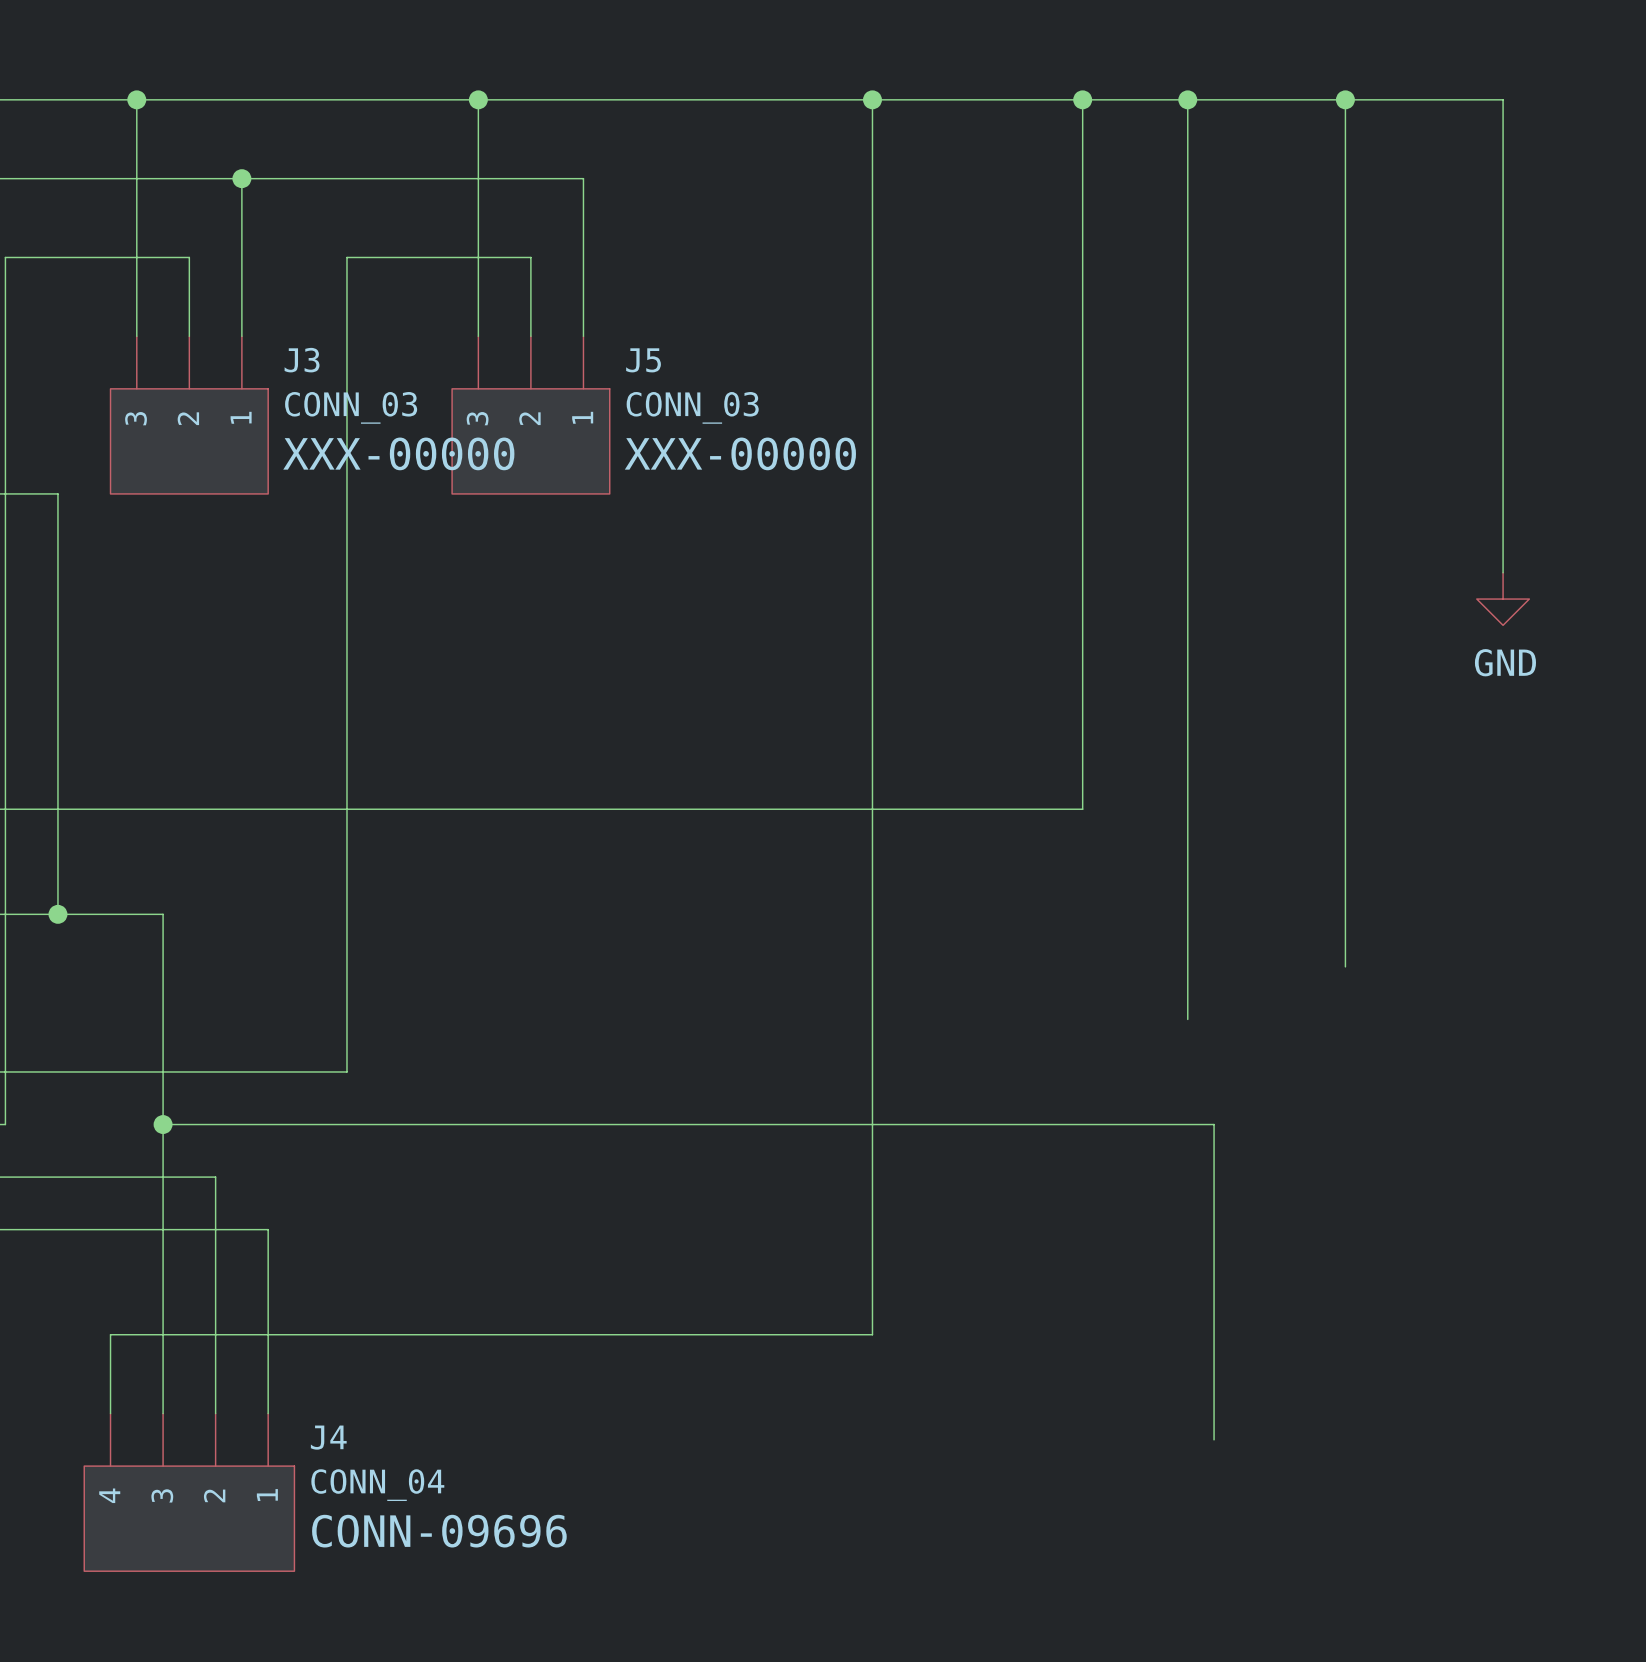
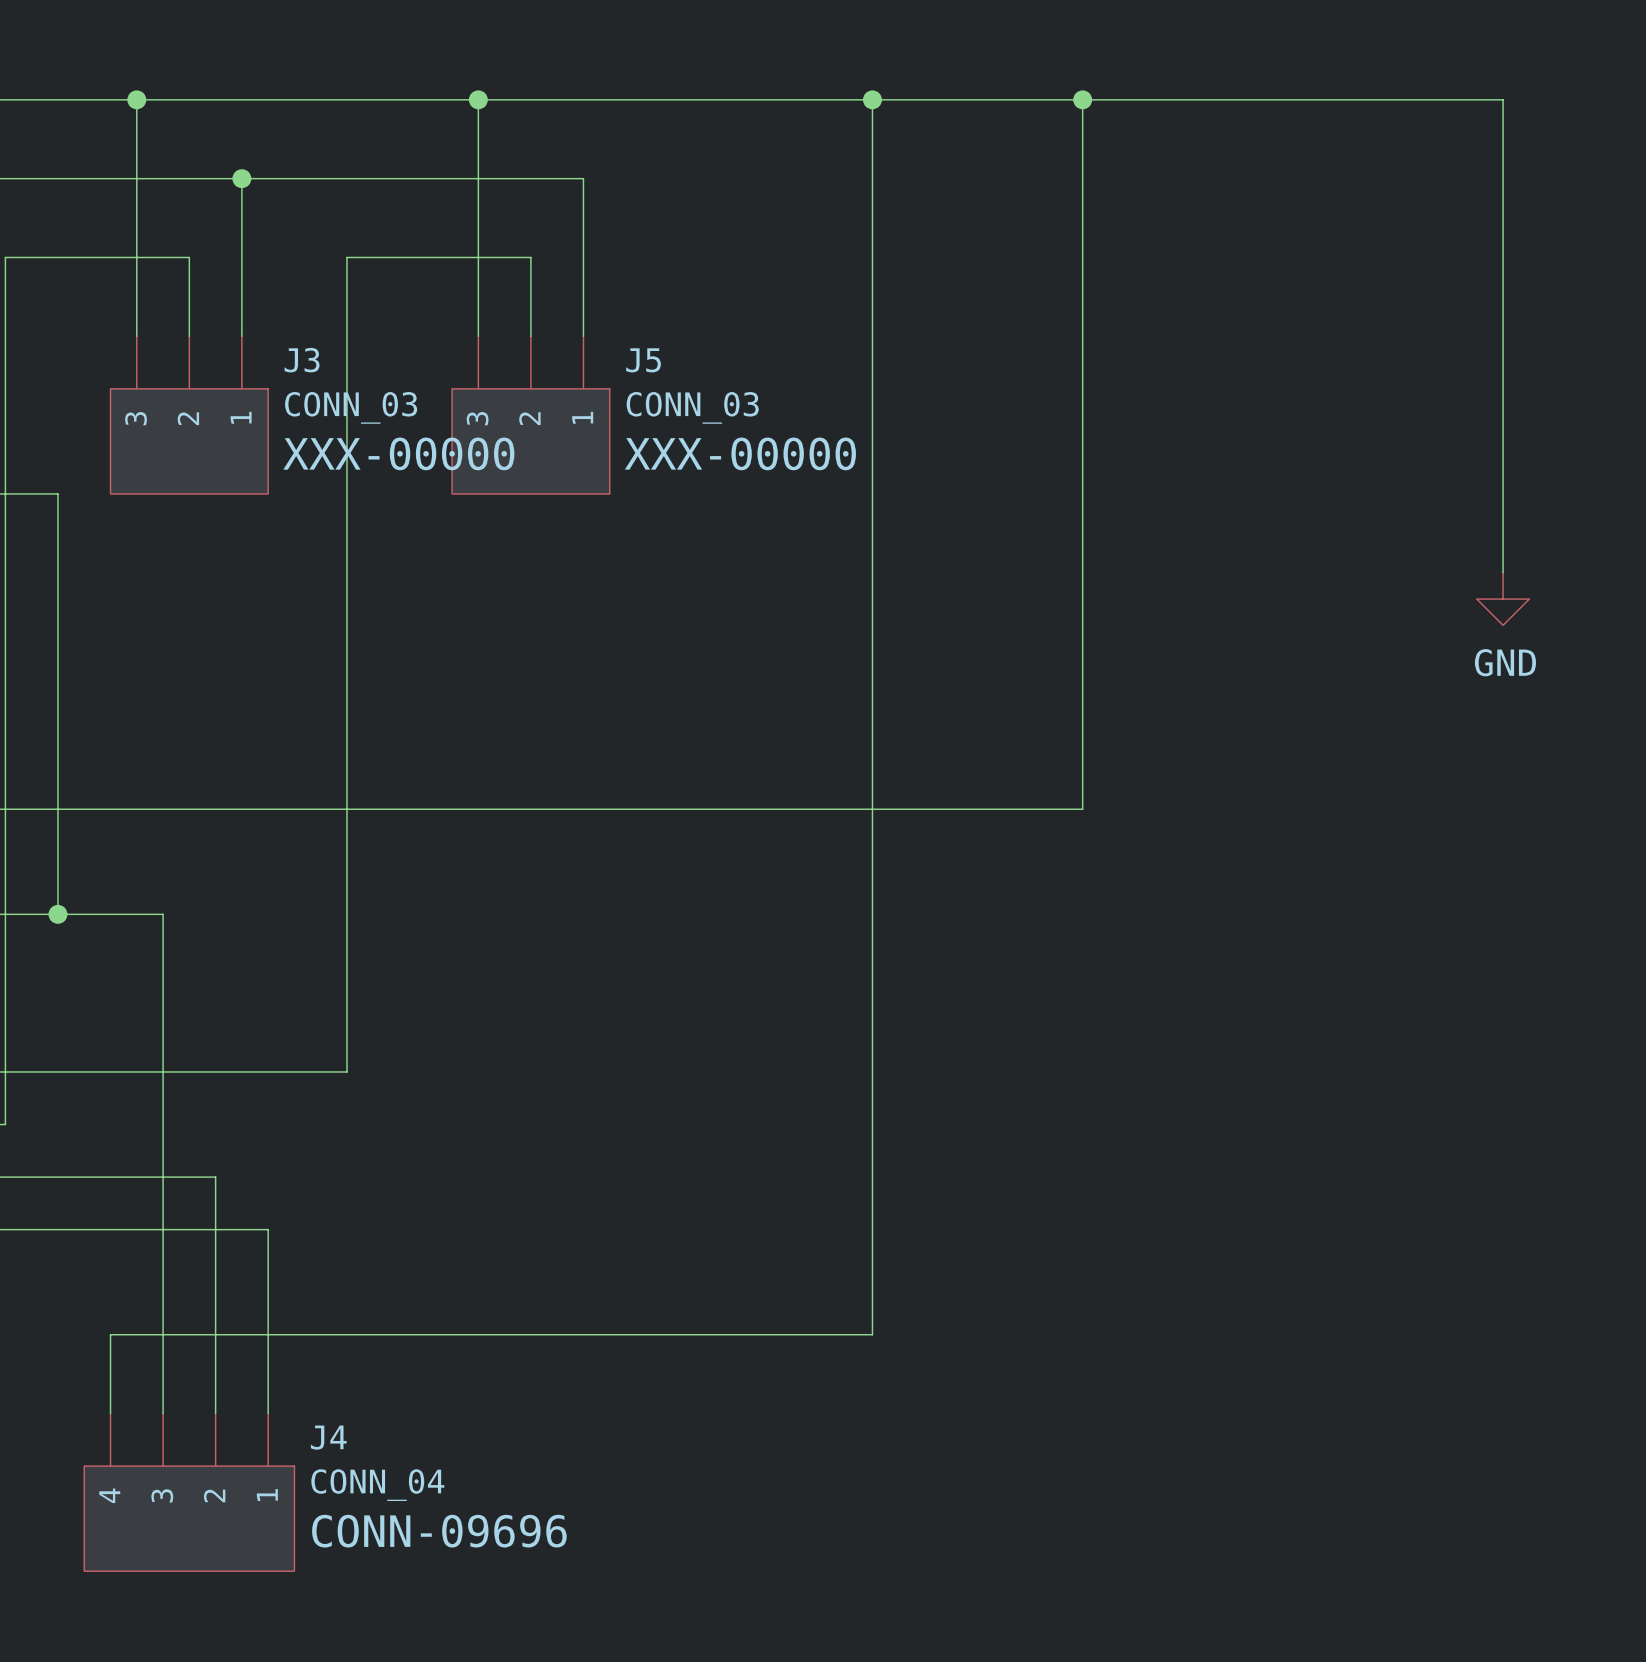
wire: (1187, 99) (1187, 1019) -> none
junction: (1187, 99) -> none
wire: (1345, 99) (1345, 966) -> none
junction: (1345, 99) -> none
wire: (163, 1124) (1214, 1124) (1214, 1439) -> none
junction: (163, 1124) -> none

